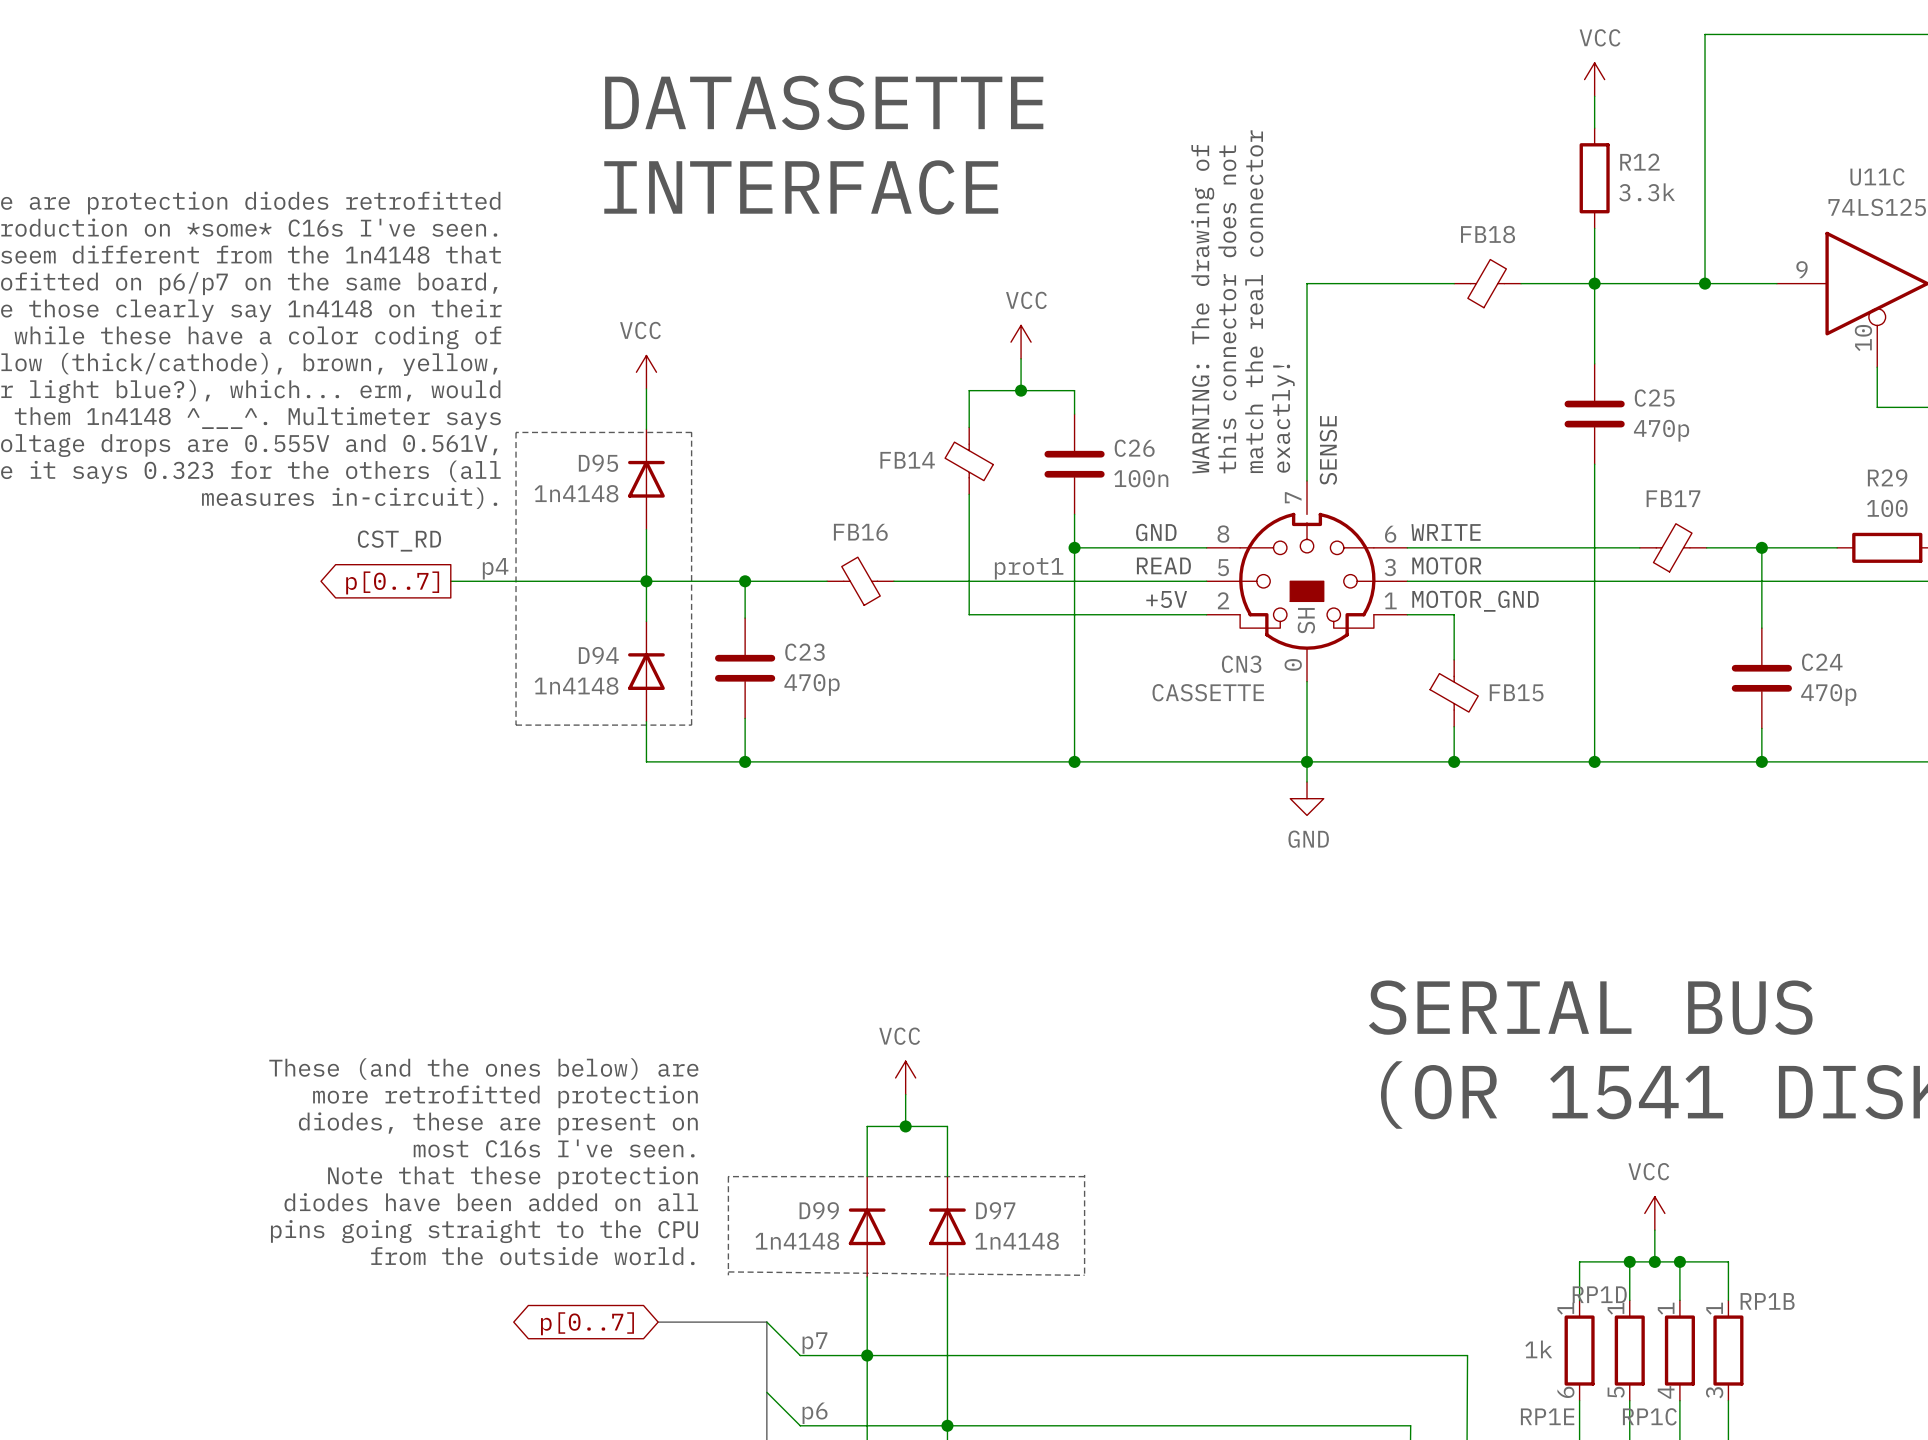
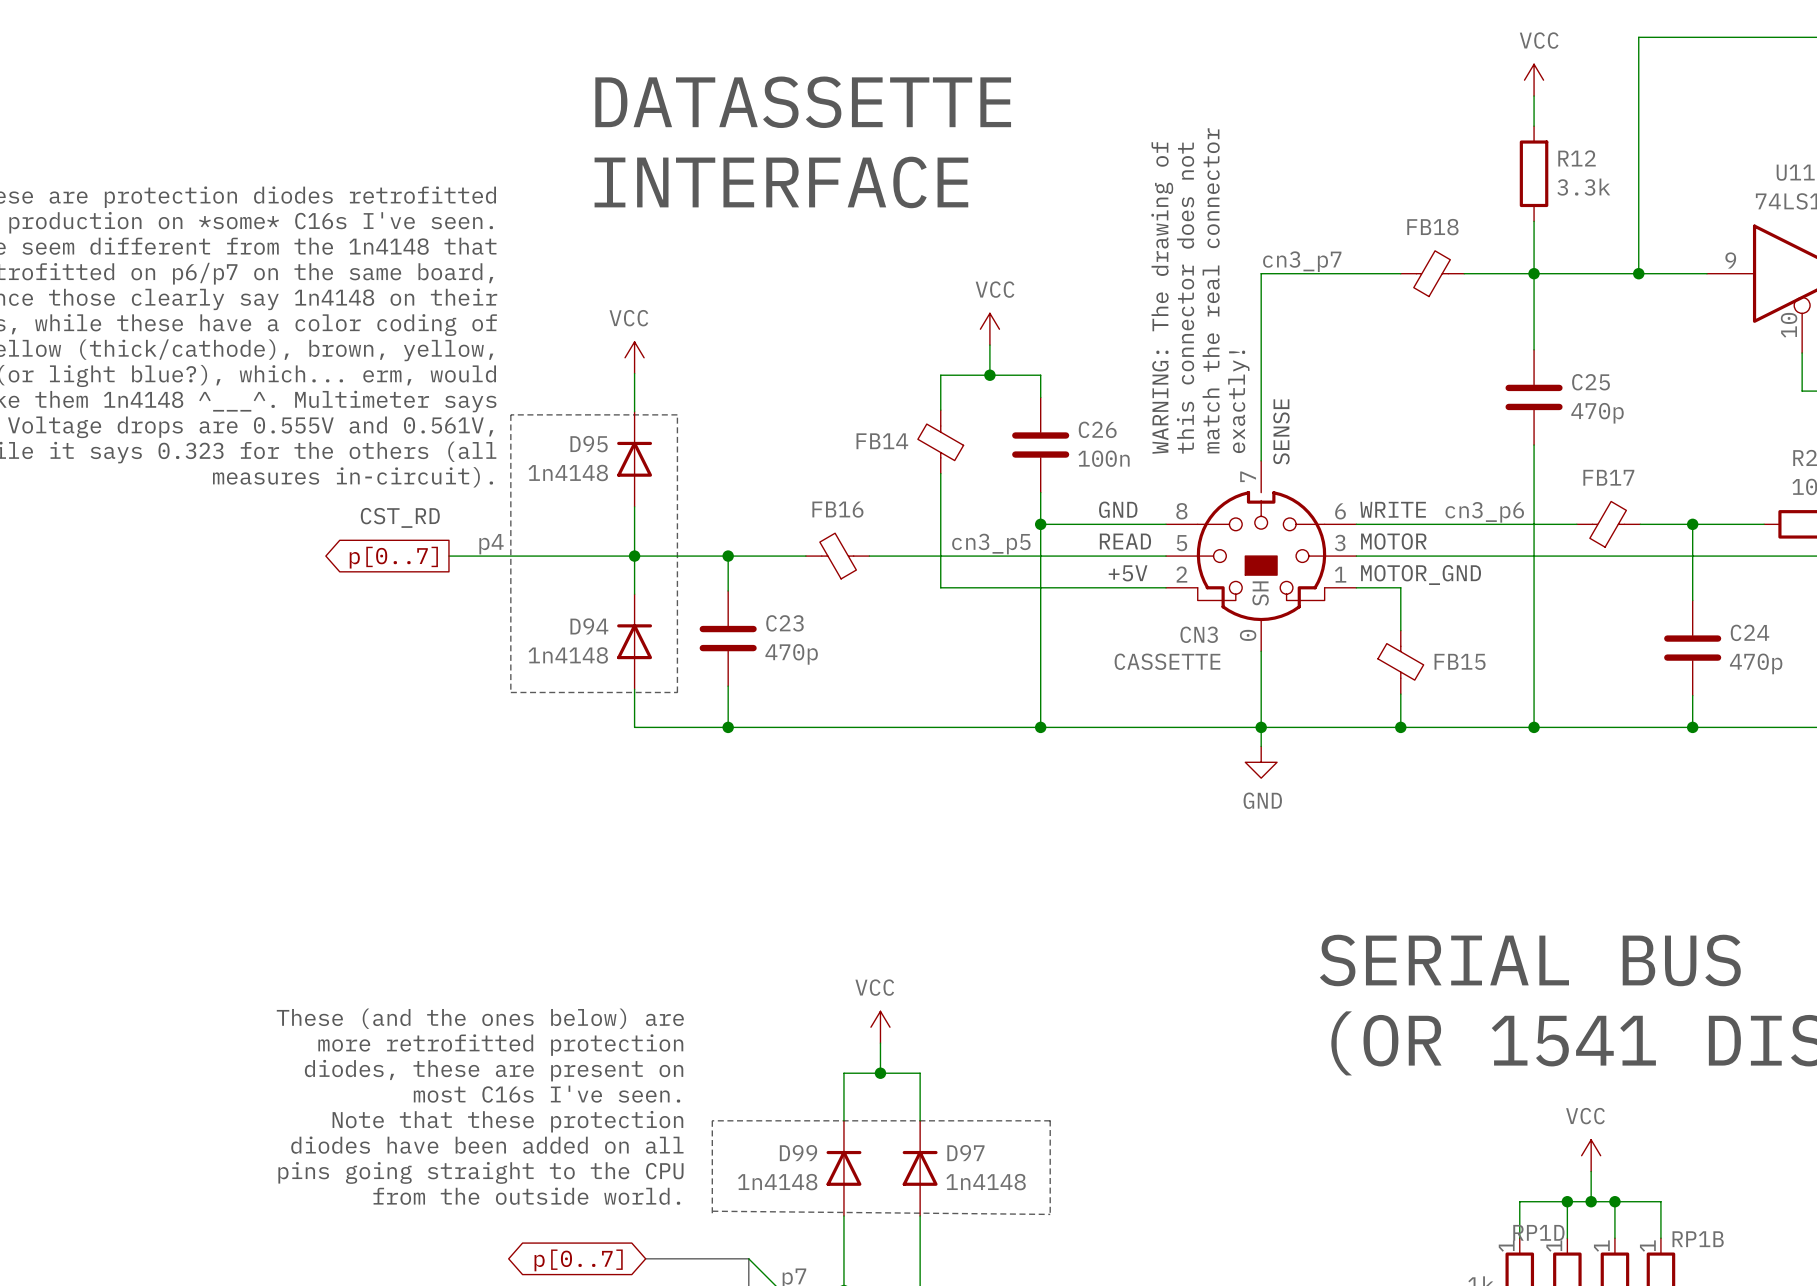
label: none -> cn3_p7 (1302, 261)
label: none -> cn3_p6 (1484, 512)
label: none -> cn3_p5 (991, 544)
label: prot1 (1029, 568) -> none

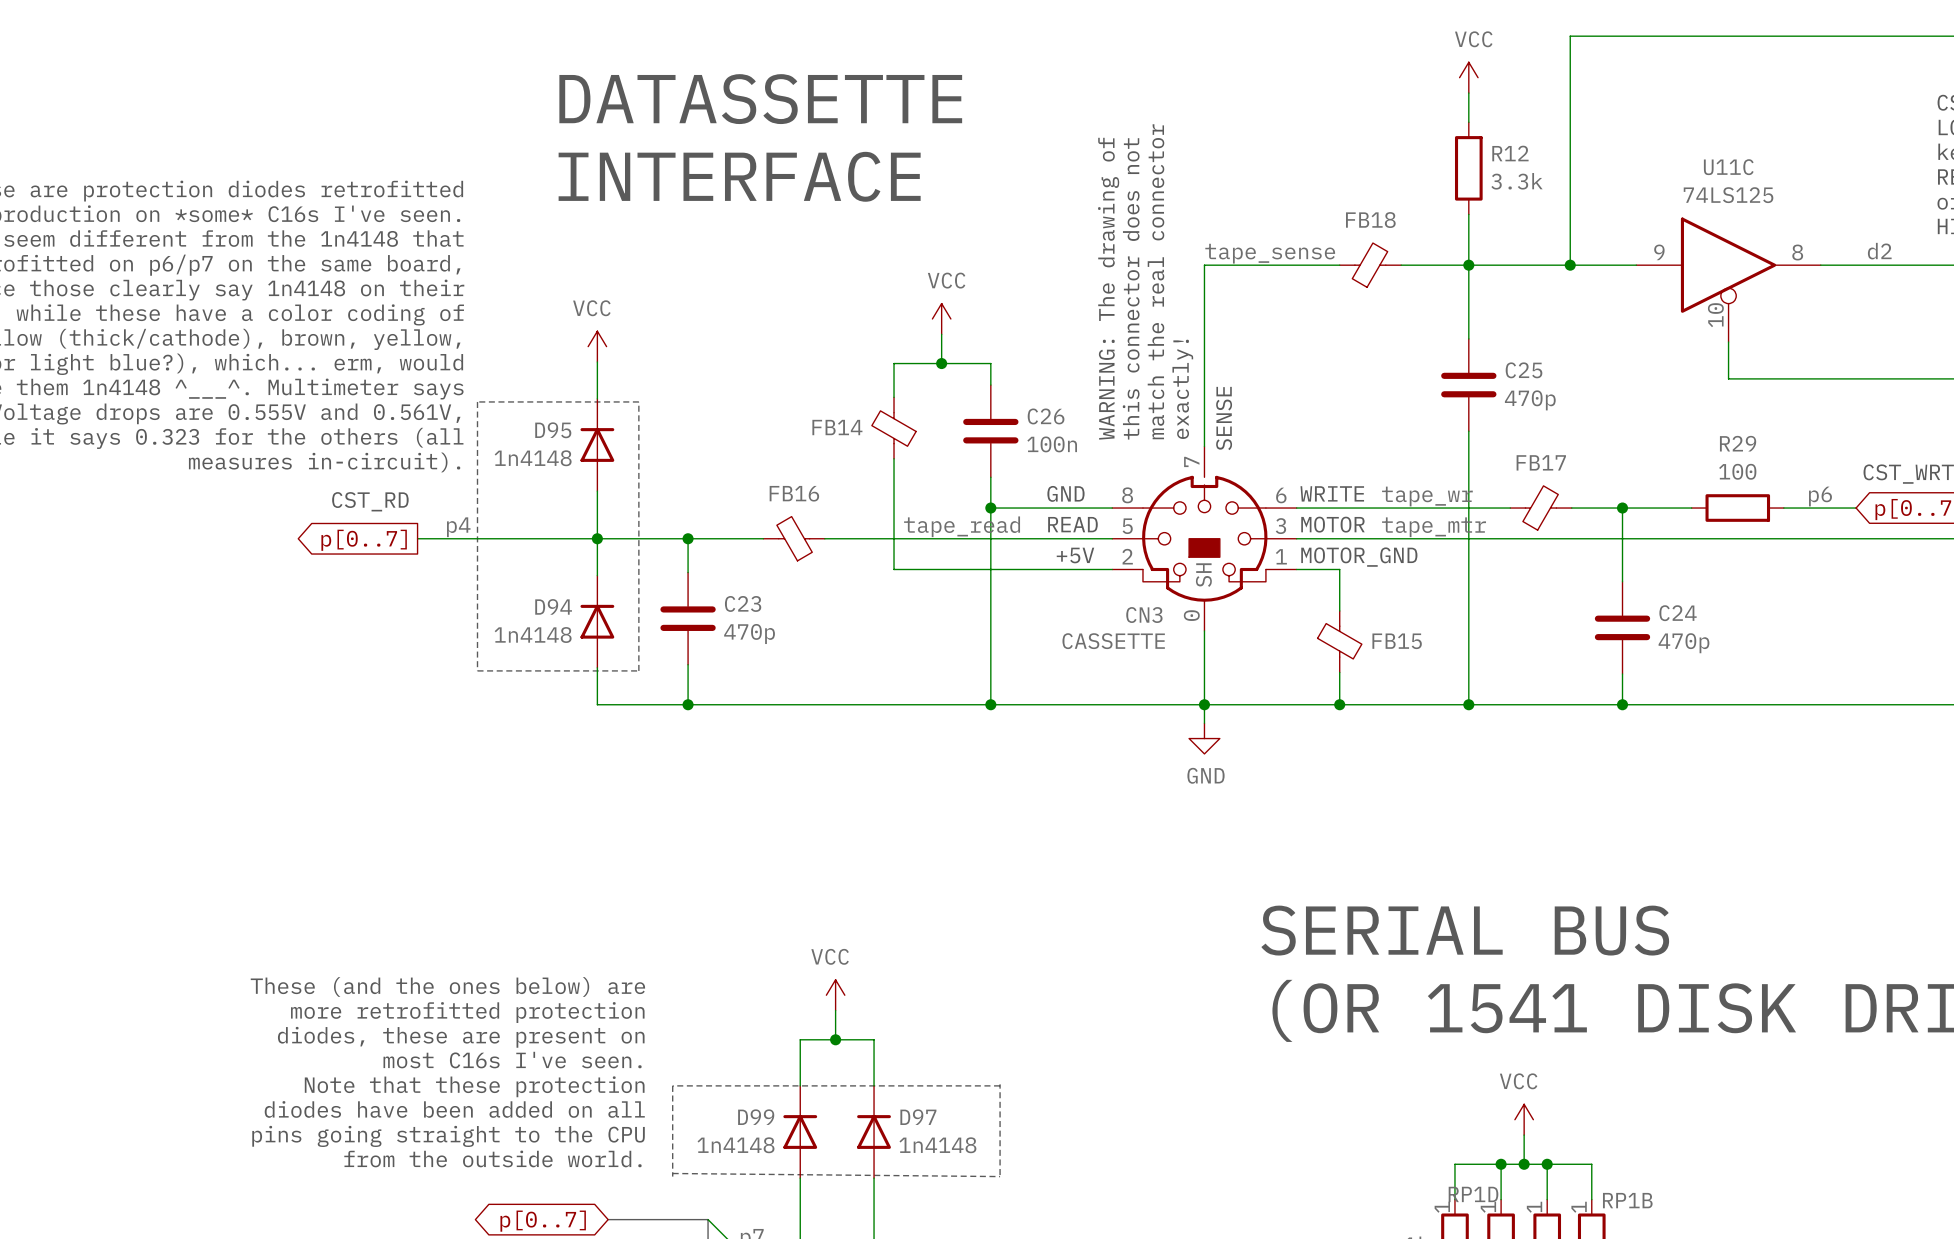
label: cn3_p7 (1302, 261) -> tape_sense (1270, 253)
label: cn3_p6 (1484, 512) -> tape_wr (1427, 496)
label: cn3_p5 (991, 544) -> tape_read (962, 526)
label: none -> tape_mtr (1434, 527)

